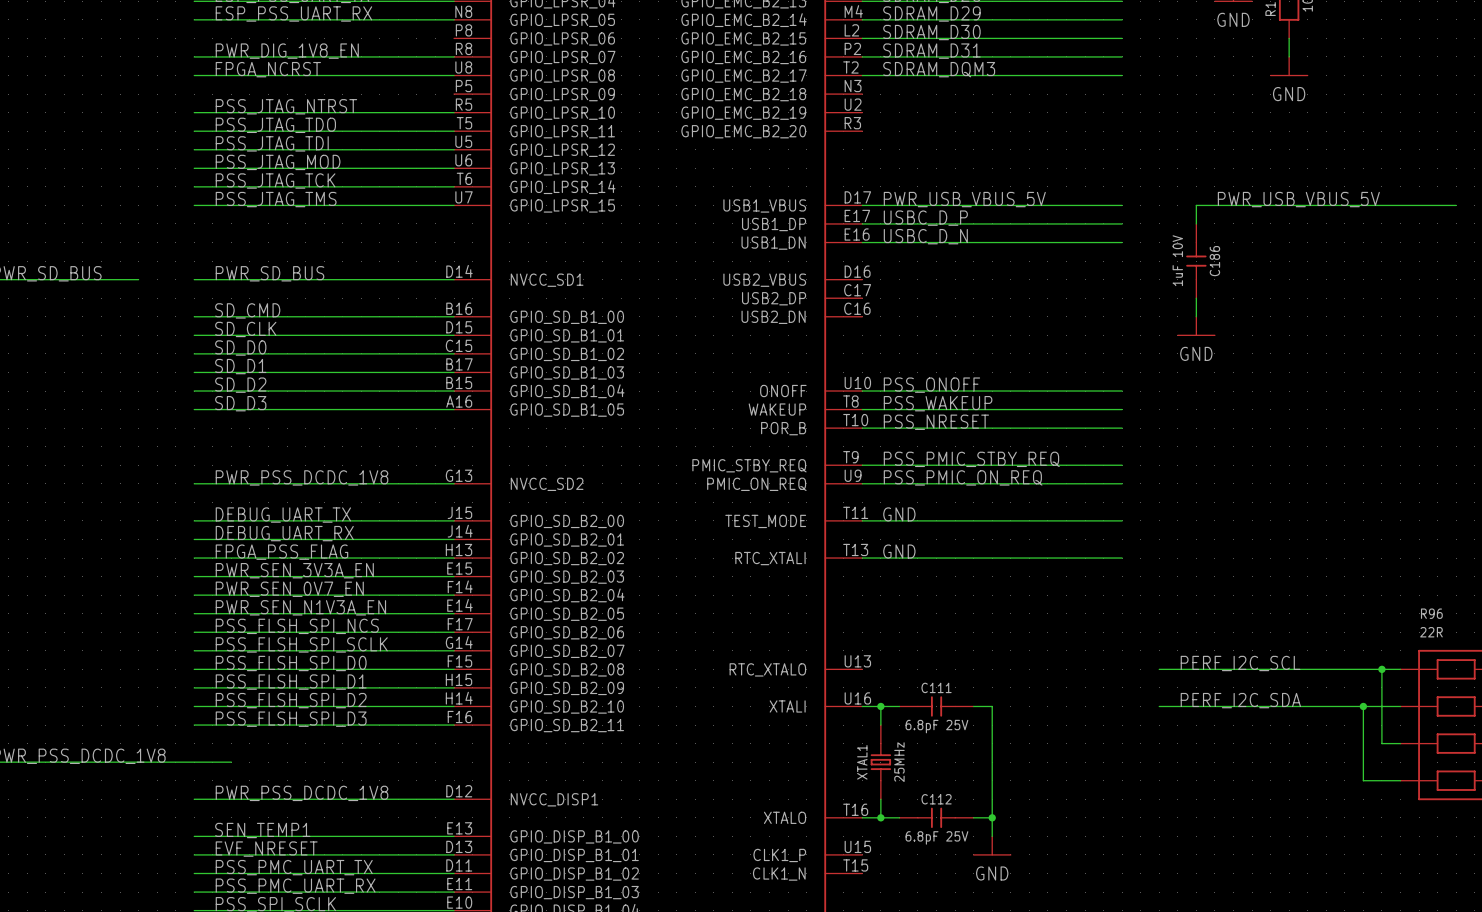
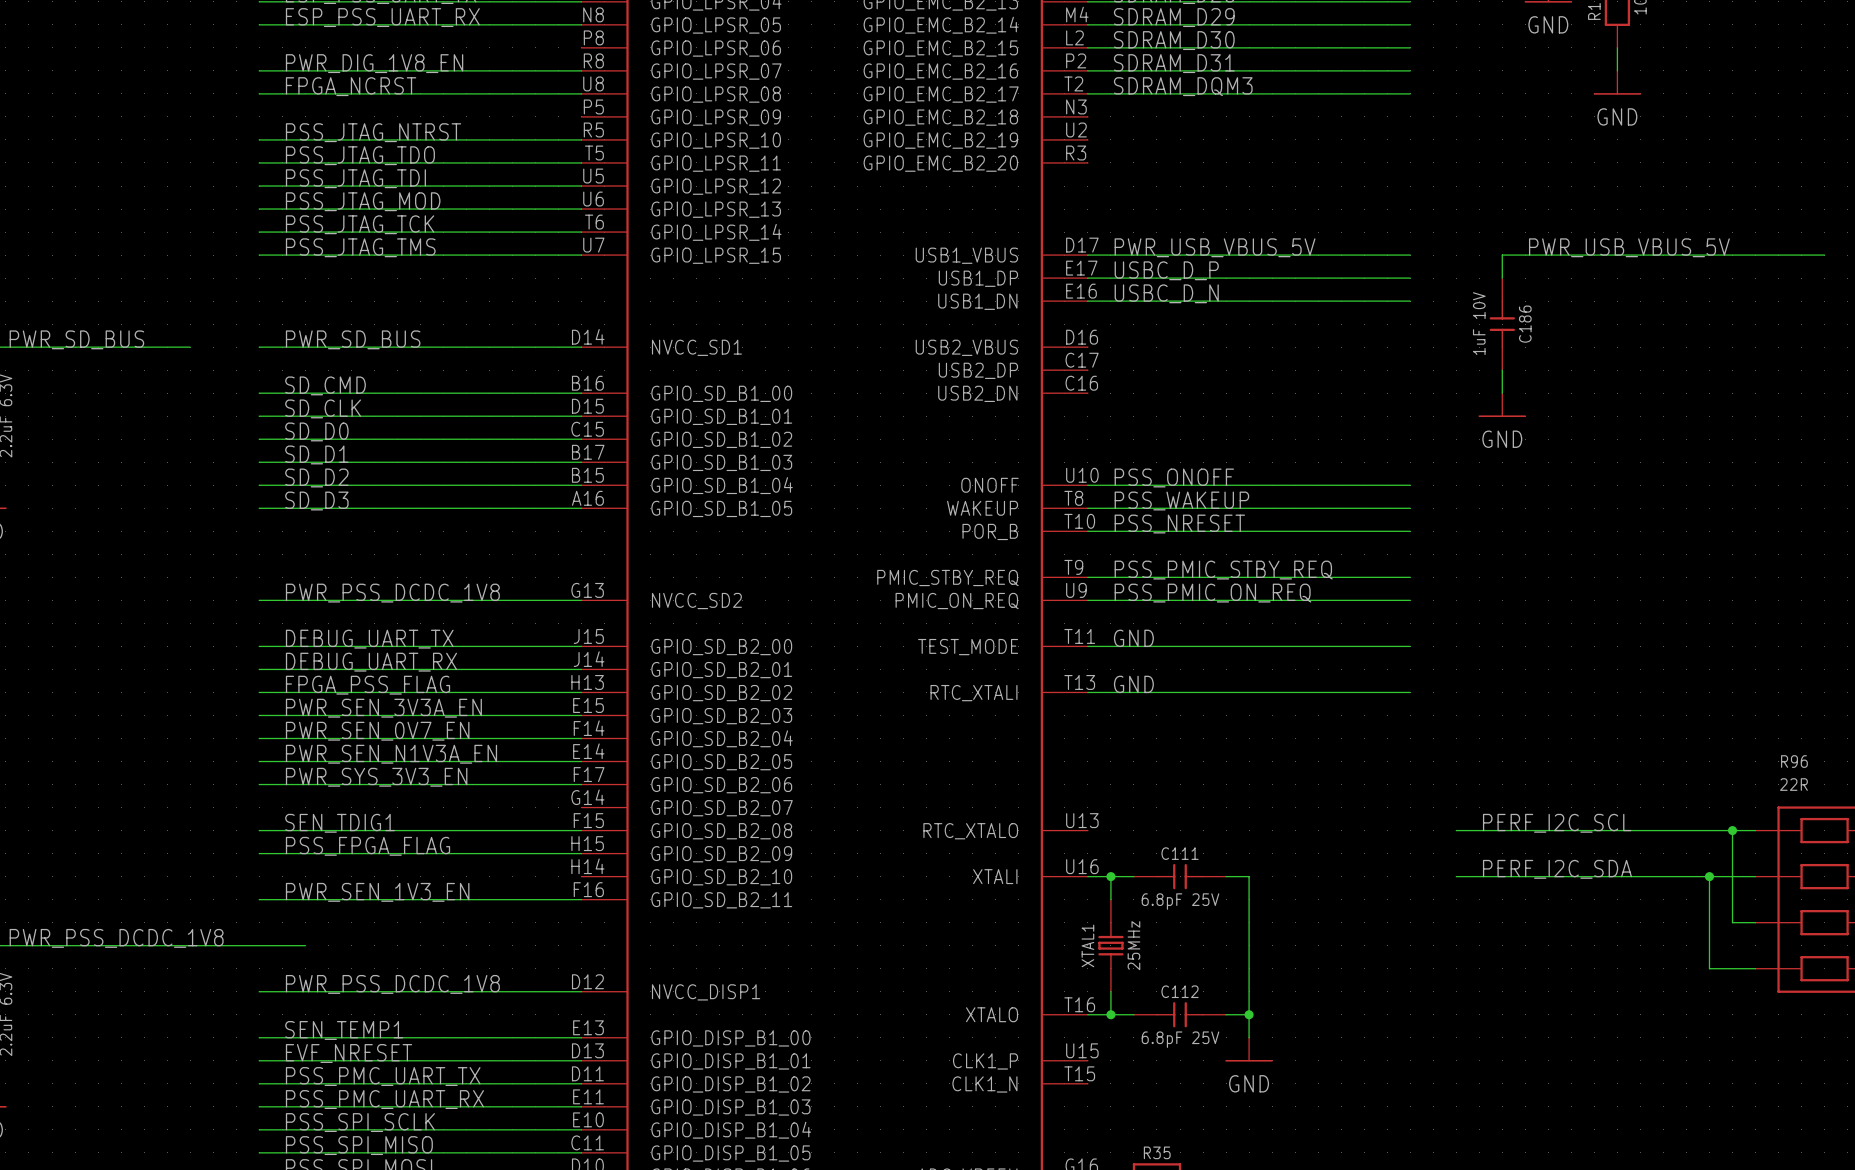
label: PSS_FLSH_SPI_NCS (297, 626) -> PWR_SYS_3V3_EN (376, 777)
label: PSS_FLSH_SPI_SCLK (301, 644) -> none
wire: (194, 650) (454, 650) -> none
label: PSS_FLSH_SPI_D0 (291, 663) -> SEN_TDIG1 (340, 823)
label: PSS_FLSH_SPI_D1 (291, 682) -> PSS_FPGA_FLAG (368, 846)
label: PSS_FLSH_SPI_D2 (291, 700) -> none
wire: (194, 706) (454, 706) -> none
label: PSS_FLSH_SPI_D3 (291, 719) -> PWR_SEN_1V3_EN (377, 892)

